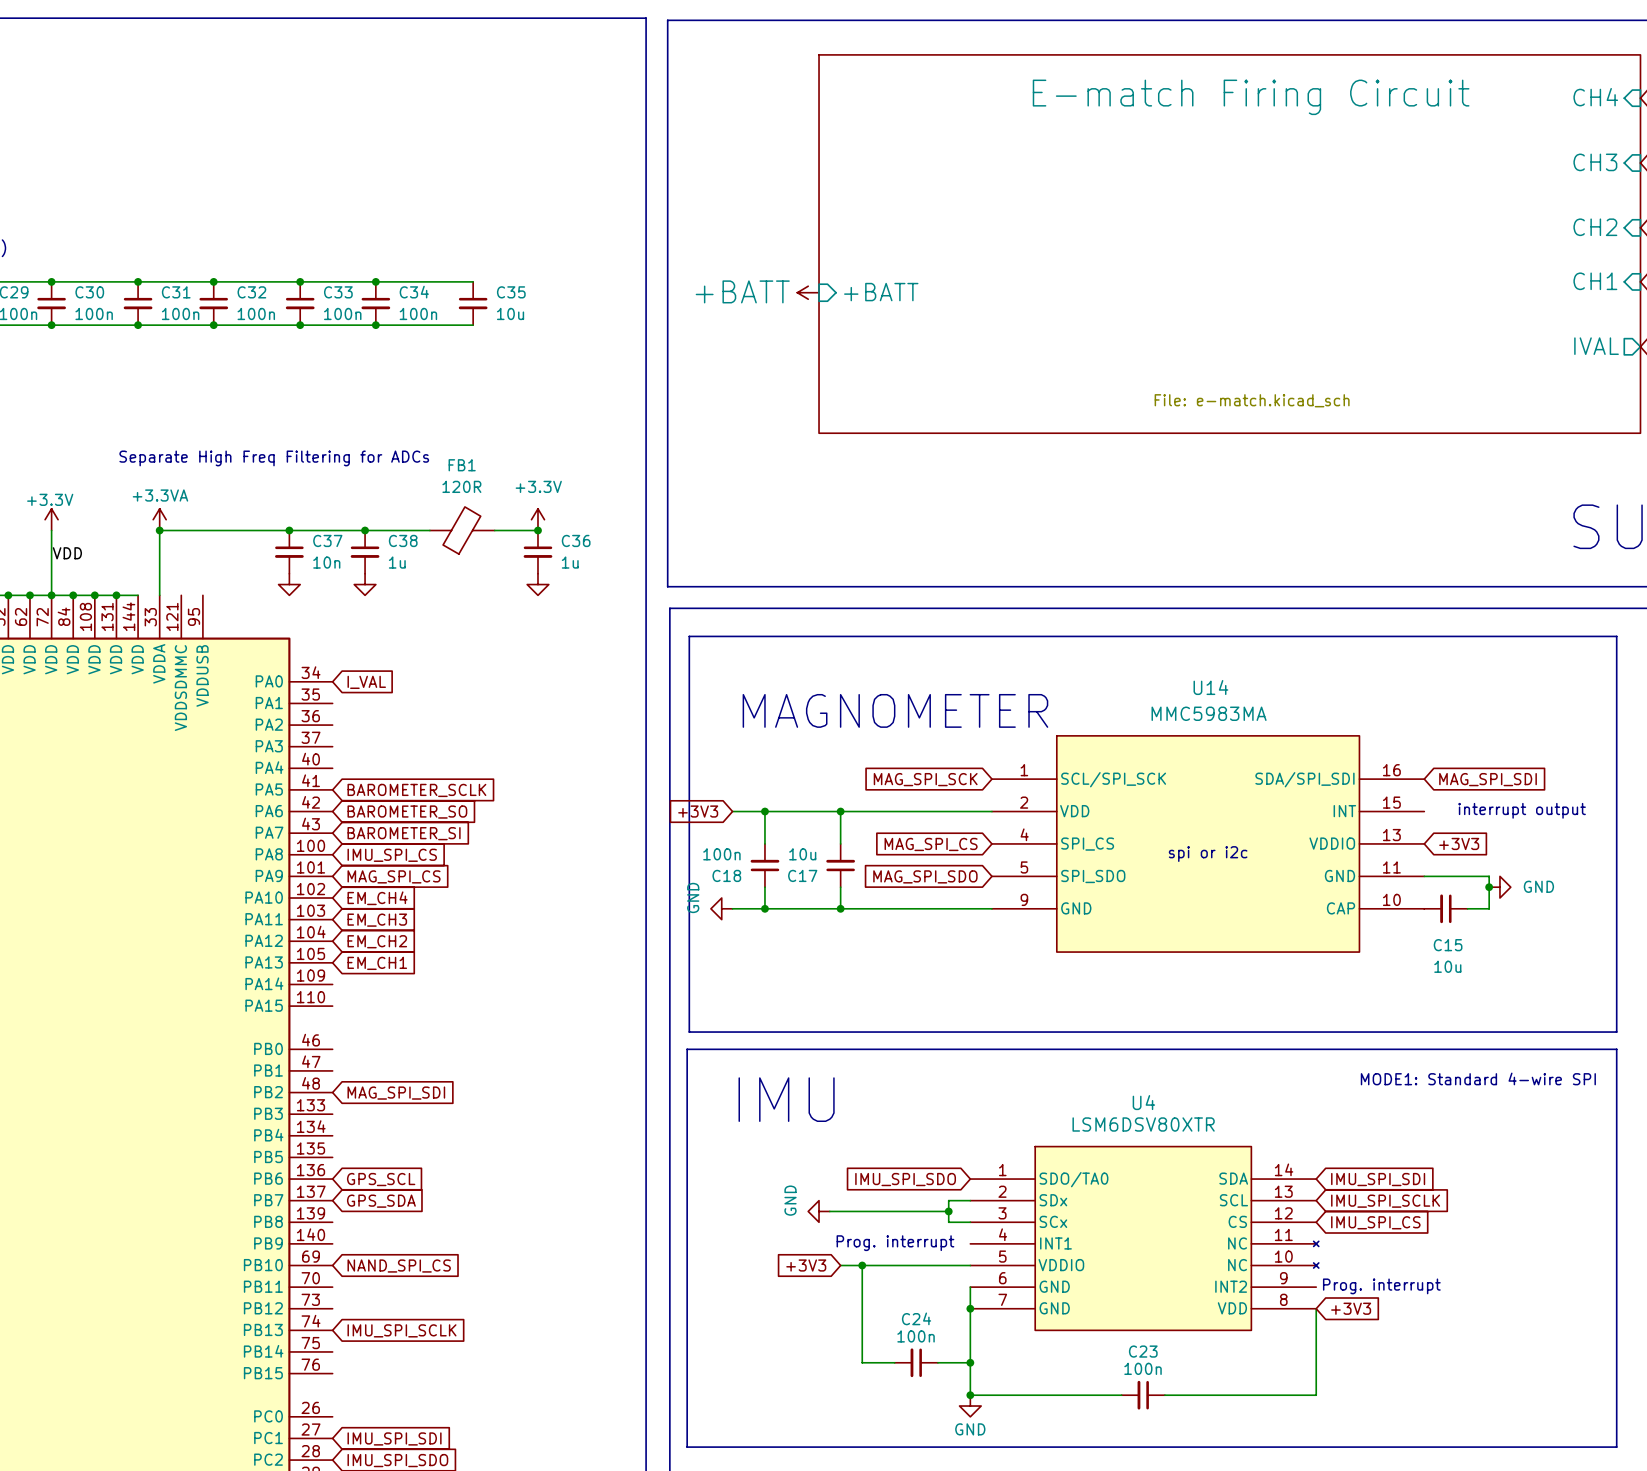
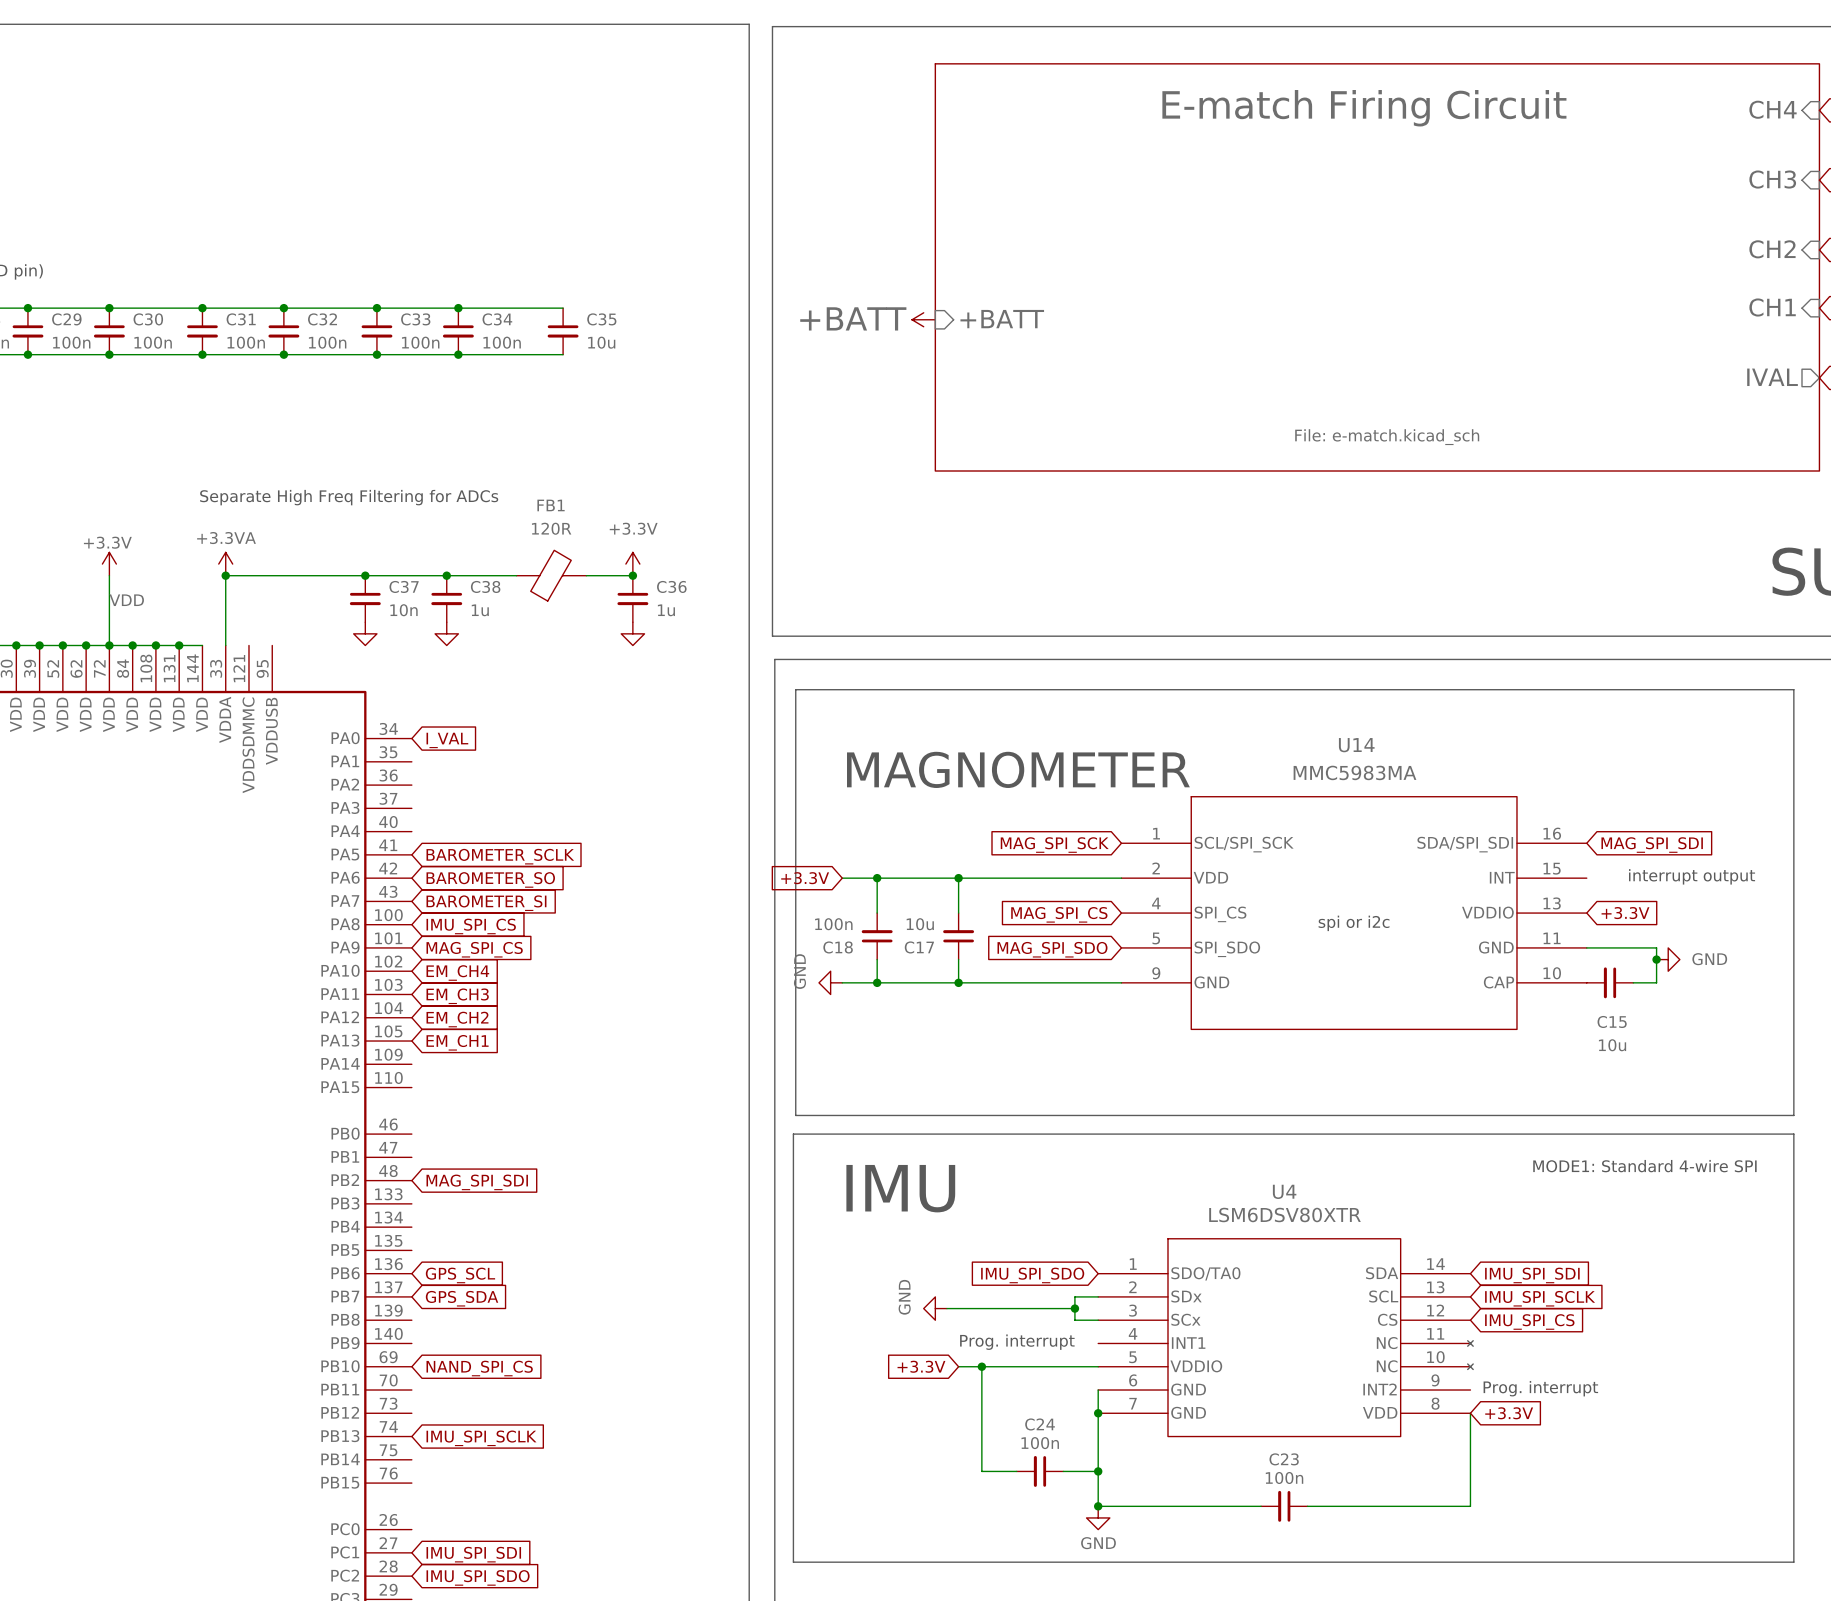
global label: +3V3 (698, 811) -> +3.3V (805, 878)
global label: +3V3 (1459, 843) -> +3.3V (1625, 913)
global label: +3V3 (806, 1265) -> +3.3V (921, 1366)
global label: +3V3 (1351, 1308) -> +3.3V (1509, 1413)

